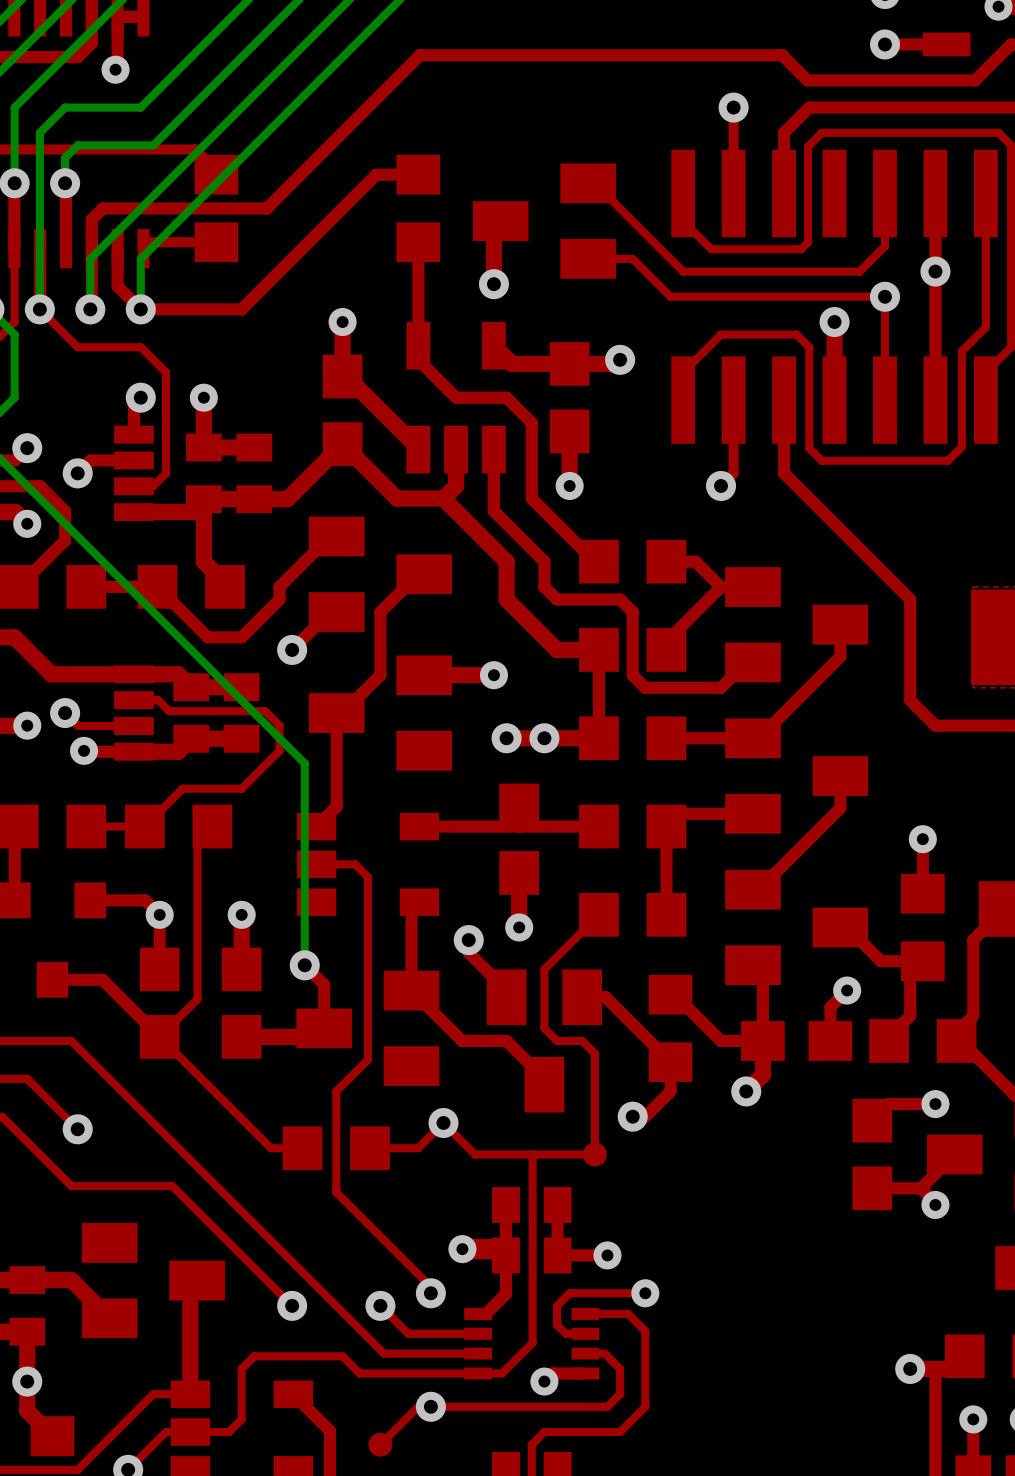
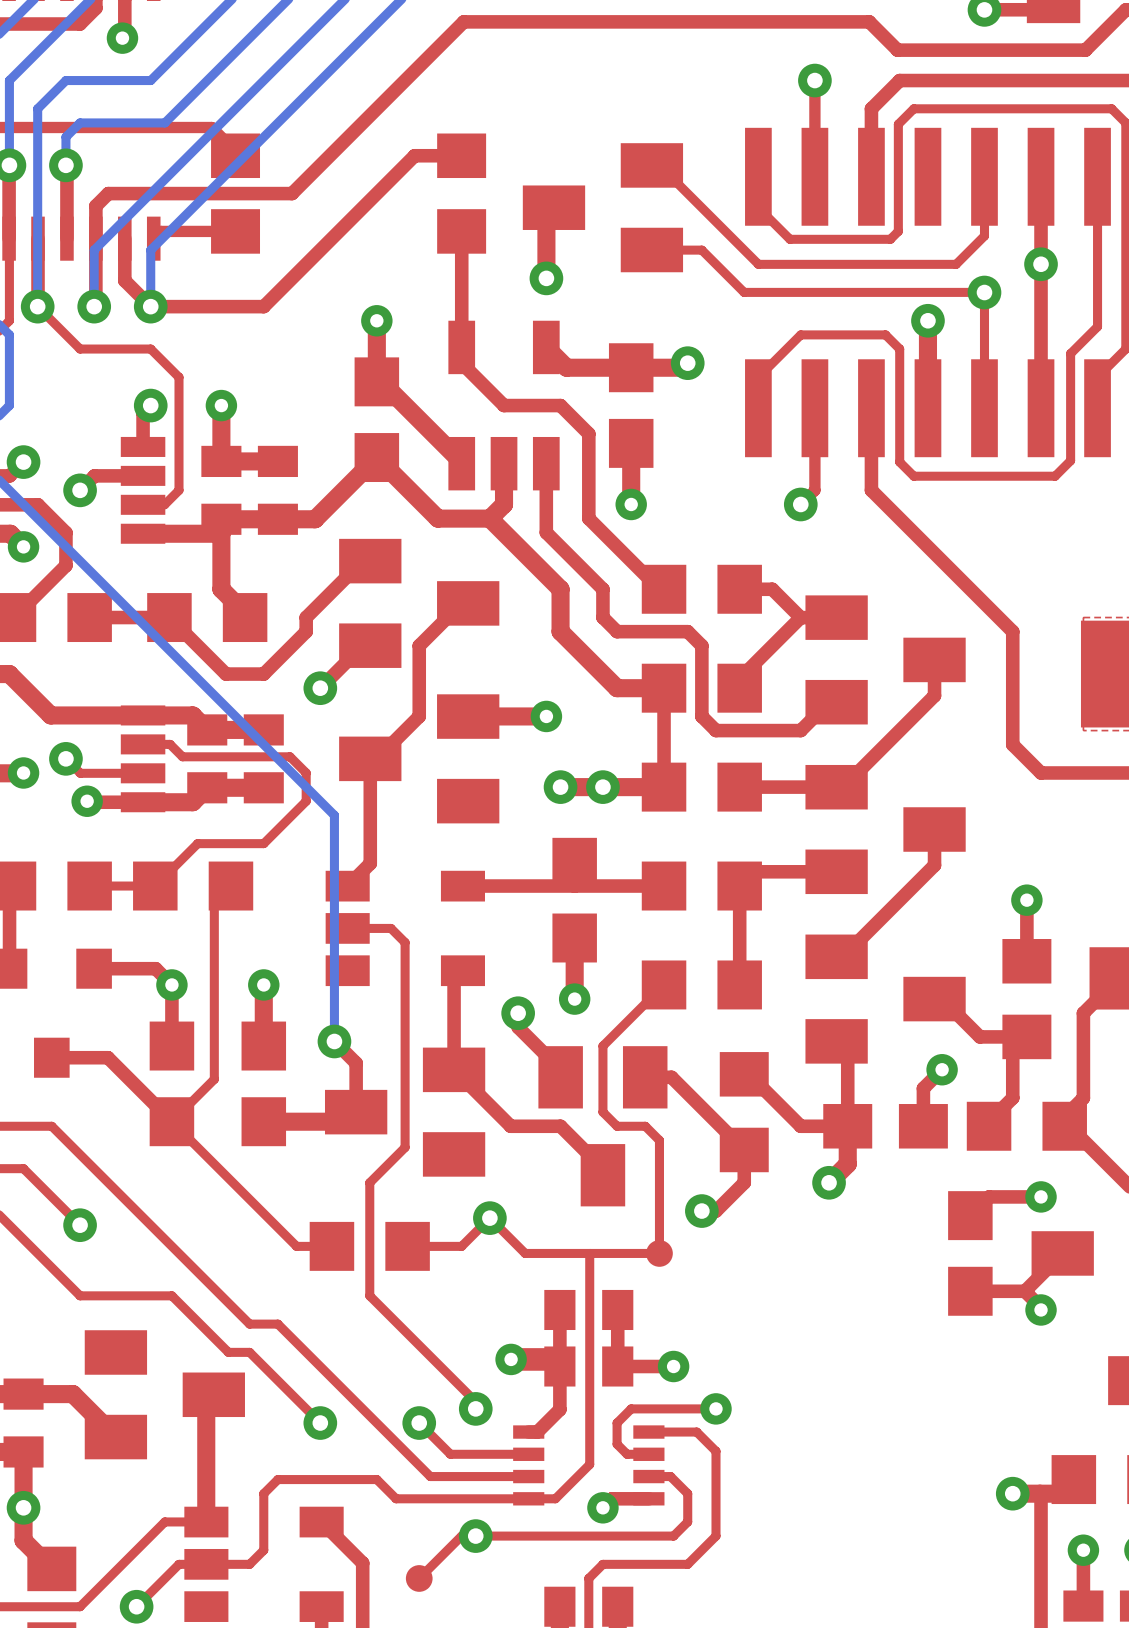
top track: (52, 1040) (71, 1040) (384, 1353) (390, 1353) -> (51, 1126) (249, 1324) (277, 1324) (430, 1476)
top track: (71, 1186) (172, 1186) (229, 1242) -> (73, 1288) (80, 1295) (171, 1295) (228, 1352) (249, 1352)

